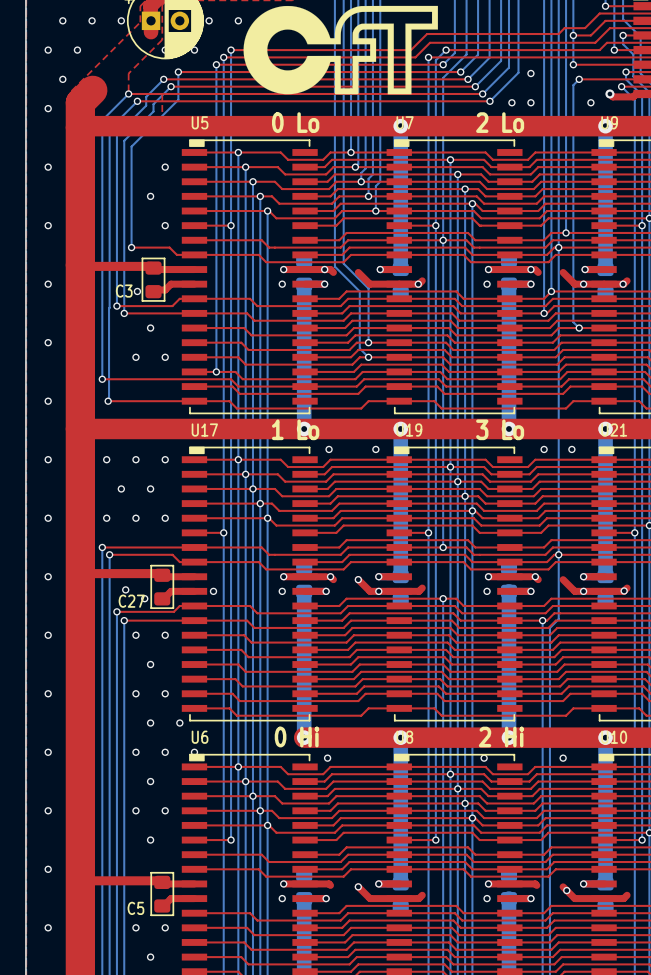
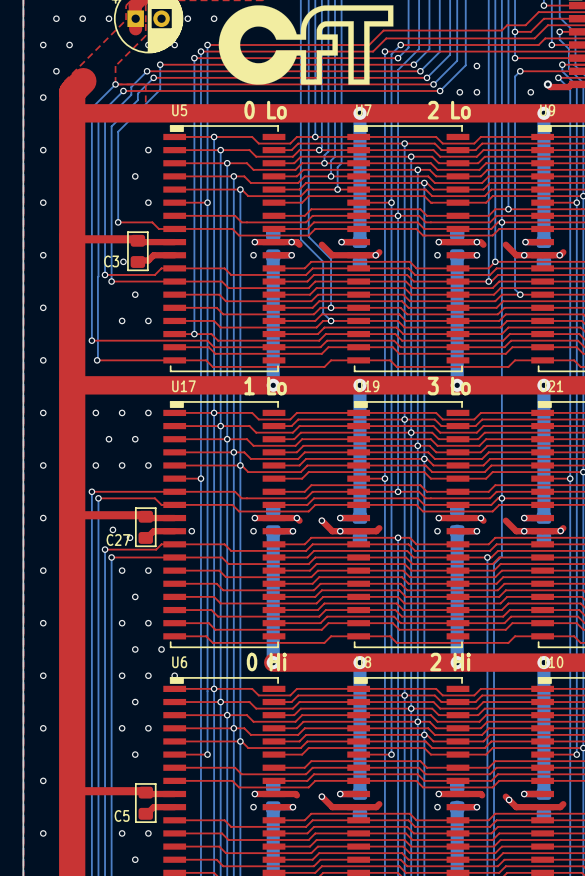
via: (329, 449) -> none
via: (375, 449) -> none
via: (544, 449) -> none
via: (571, 449) -> none
via: (327, 758) -> none
via: (484, 758) -> none
via: (563, 758) -> none

